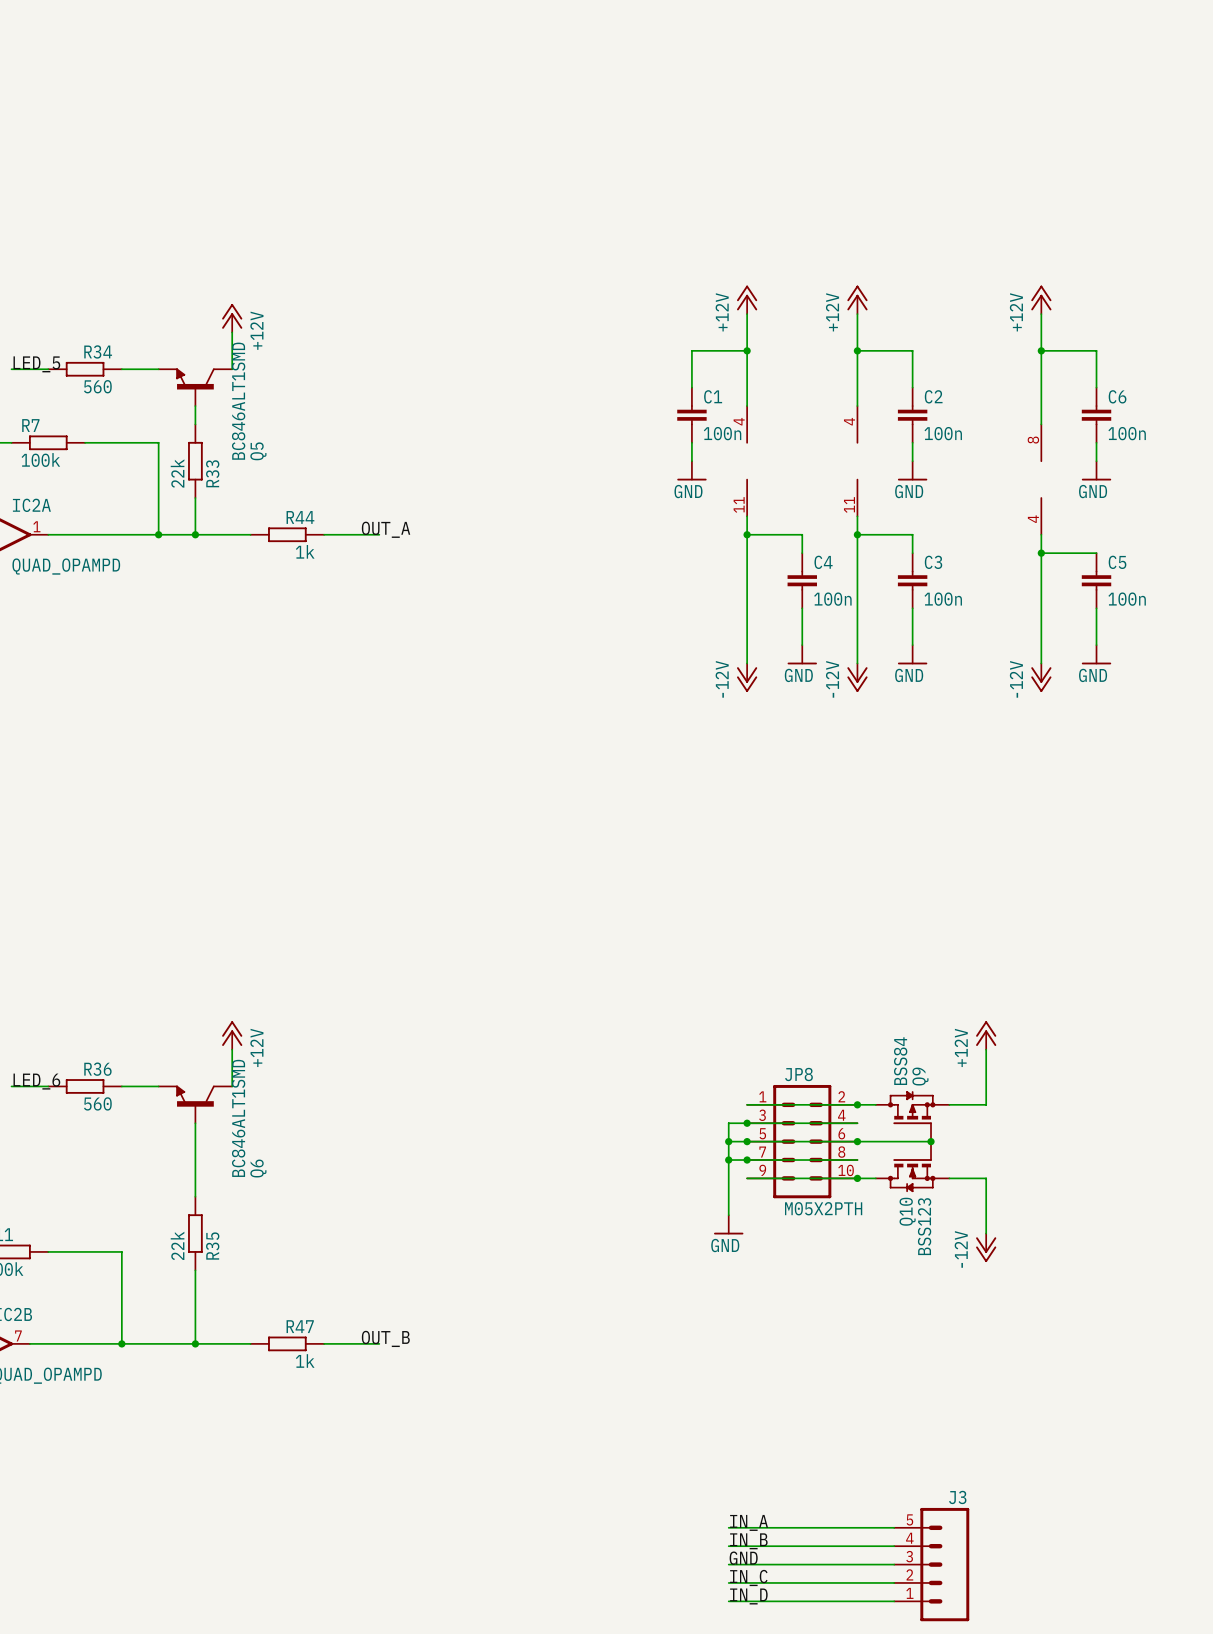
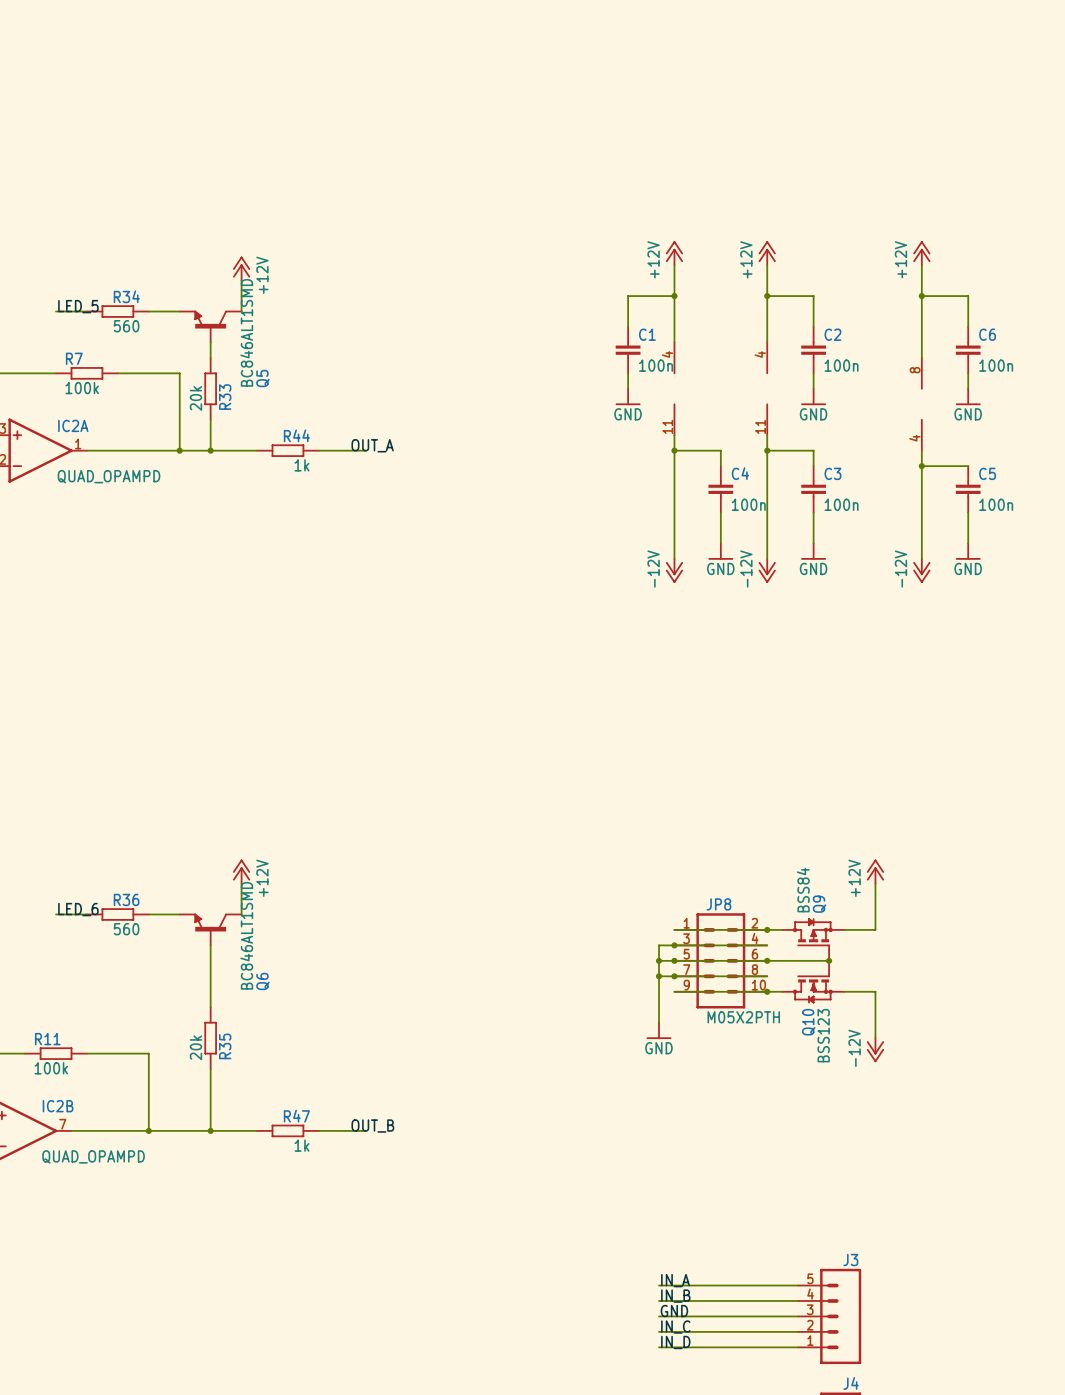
R33 value: 22k (177, 473) -> 20k (195, 398)
R35 value: 22k (177, 1245) -> 20k (195, 1047)

